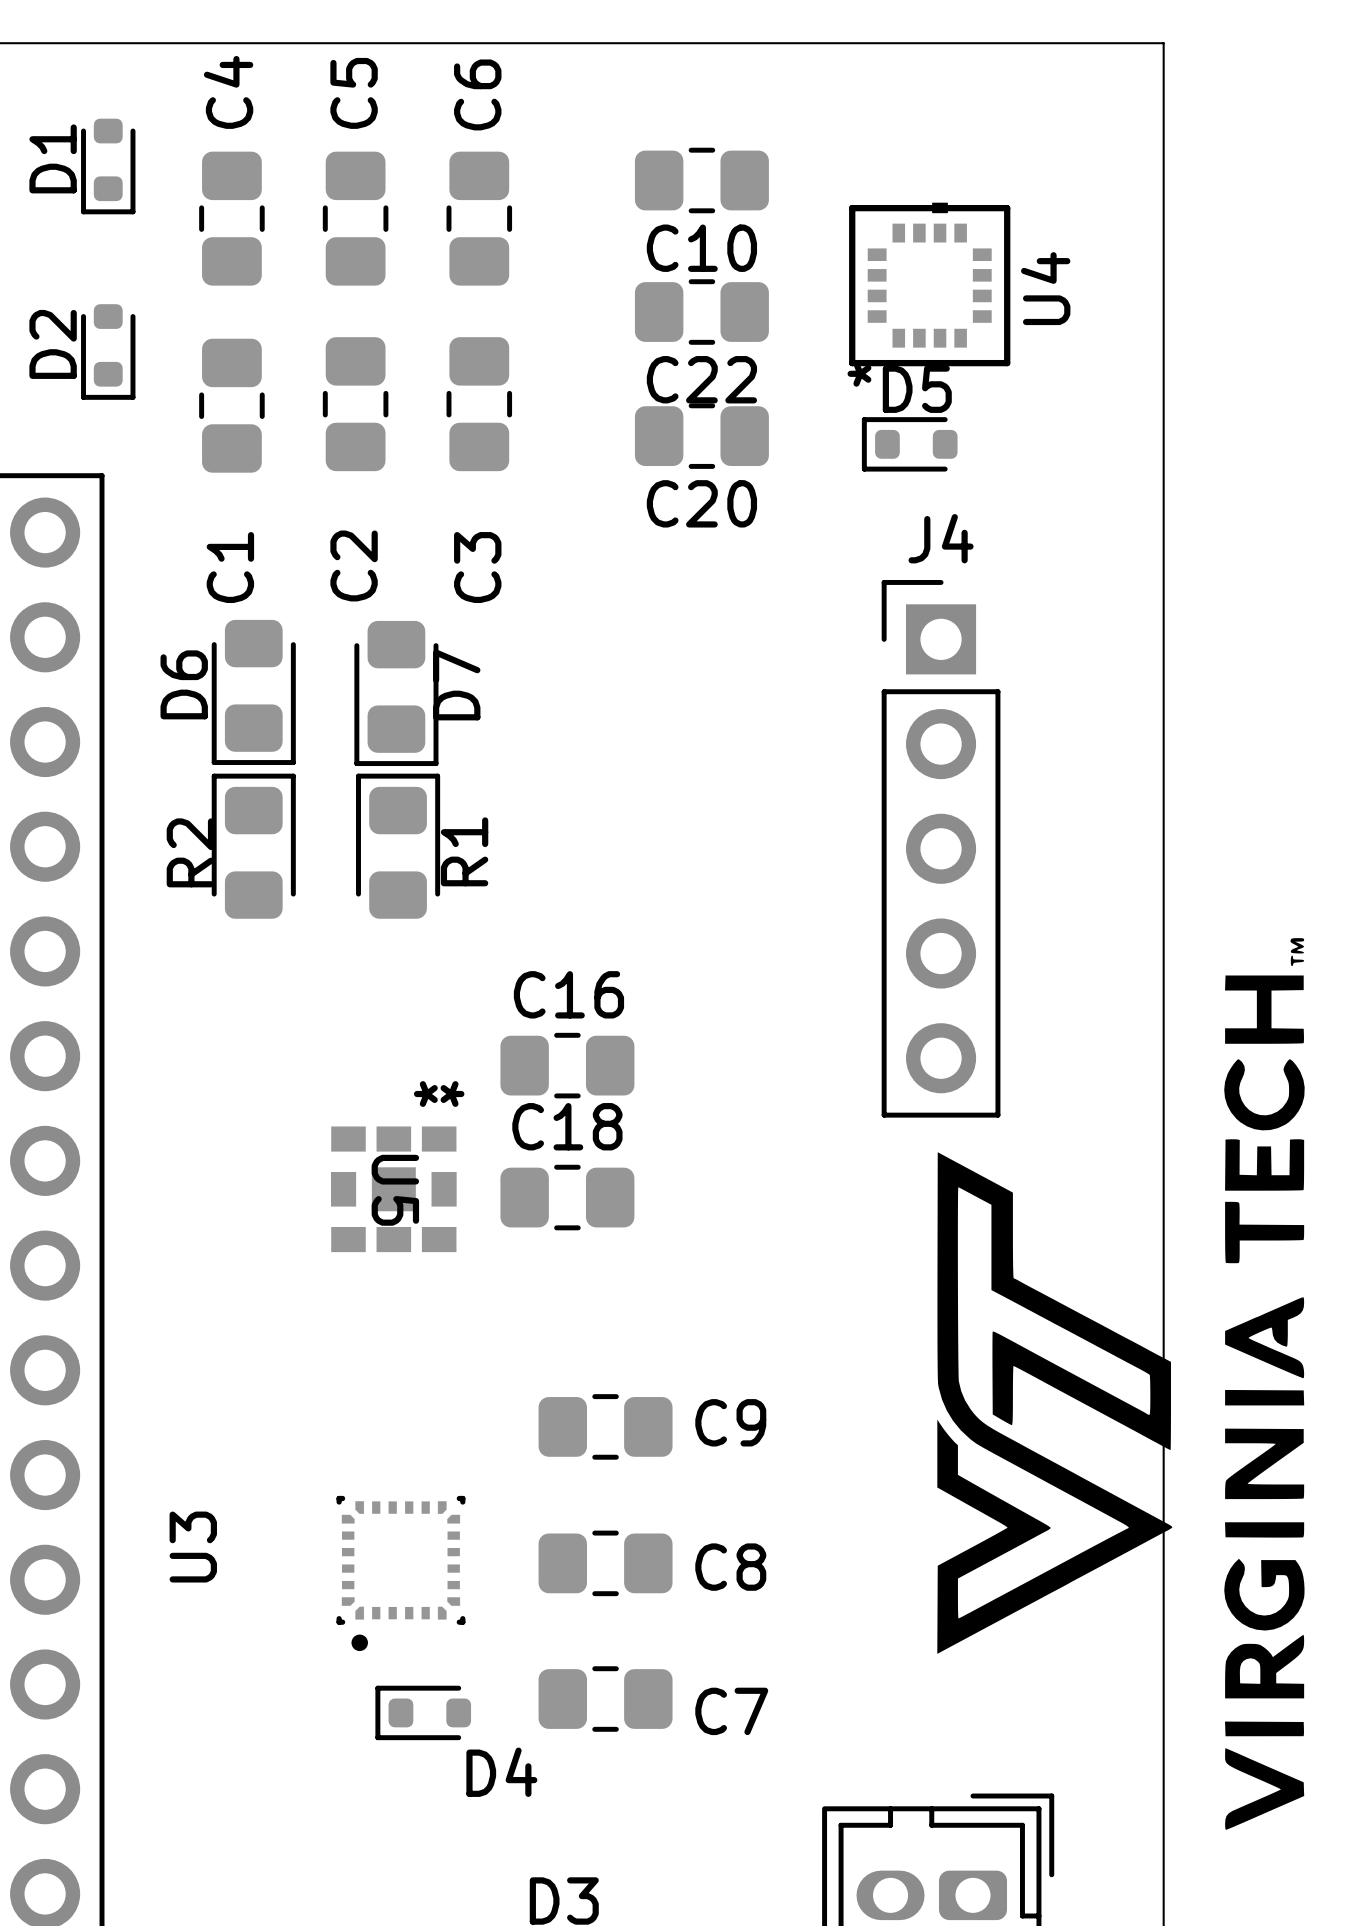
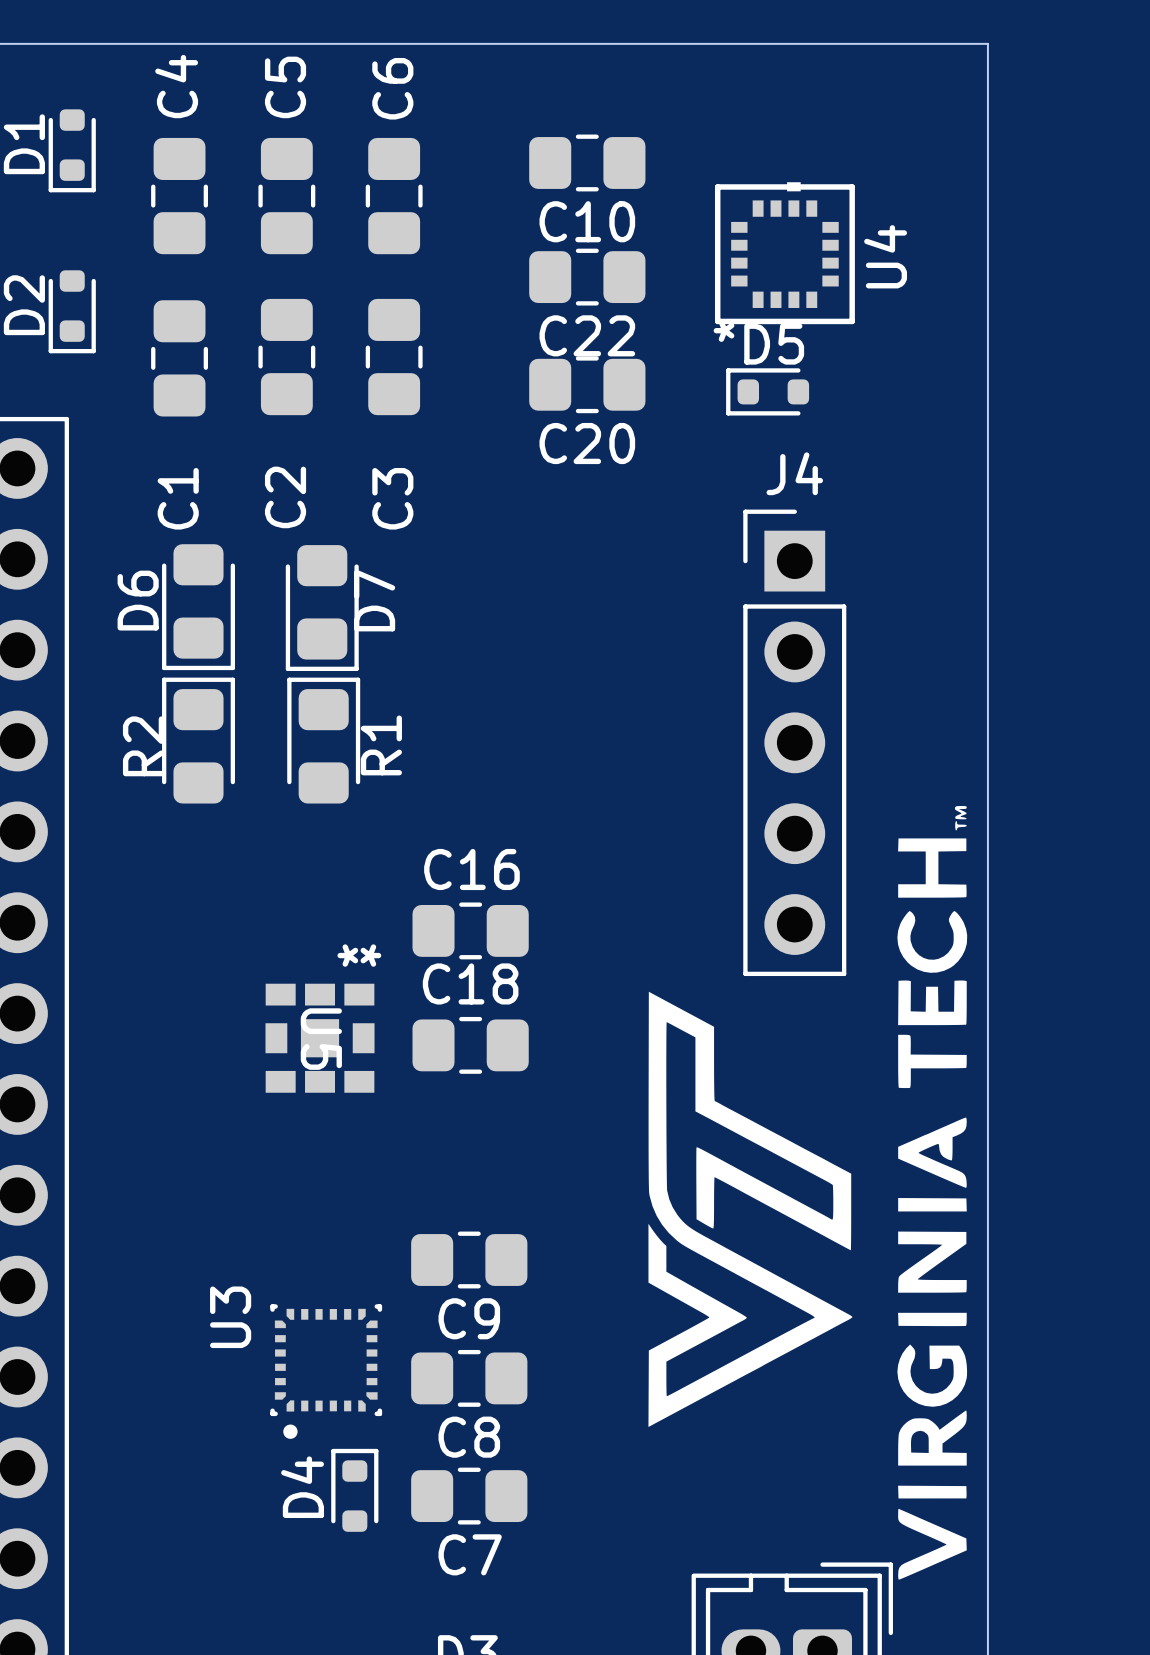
drawing position: (1120, 1383) -> (807, 1192)
C9 name position: C9 (730, 1422) -> C9 (469, 1318)
C9 position: (605, 1426) -> (469, 1260)
U3 name position: U3 (193, 1547) -> U3 (230, 1317)
C8 position: (605, 1563) -> (469, 1378)
C8 name position: C8 (730, 1567) -> C8 (469, 1437)
C7 position: (605, 1699) -> (469, 1496)
C7 name position: C7 (731, 1711) -> C7 (470, 1554)
D4 rotation: 0° (423, 1712) -> 90° clockwise (354, 1490)

